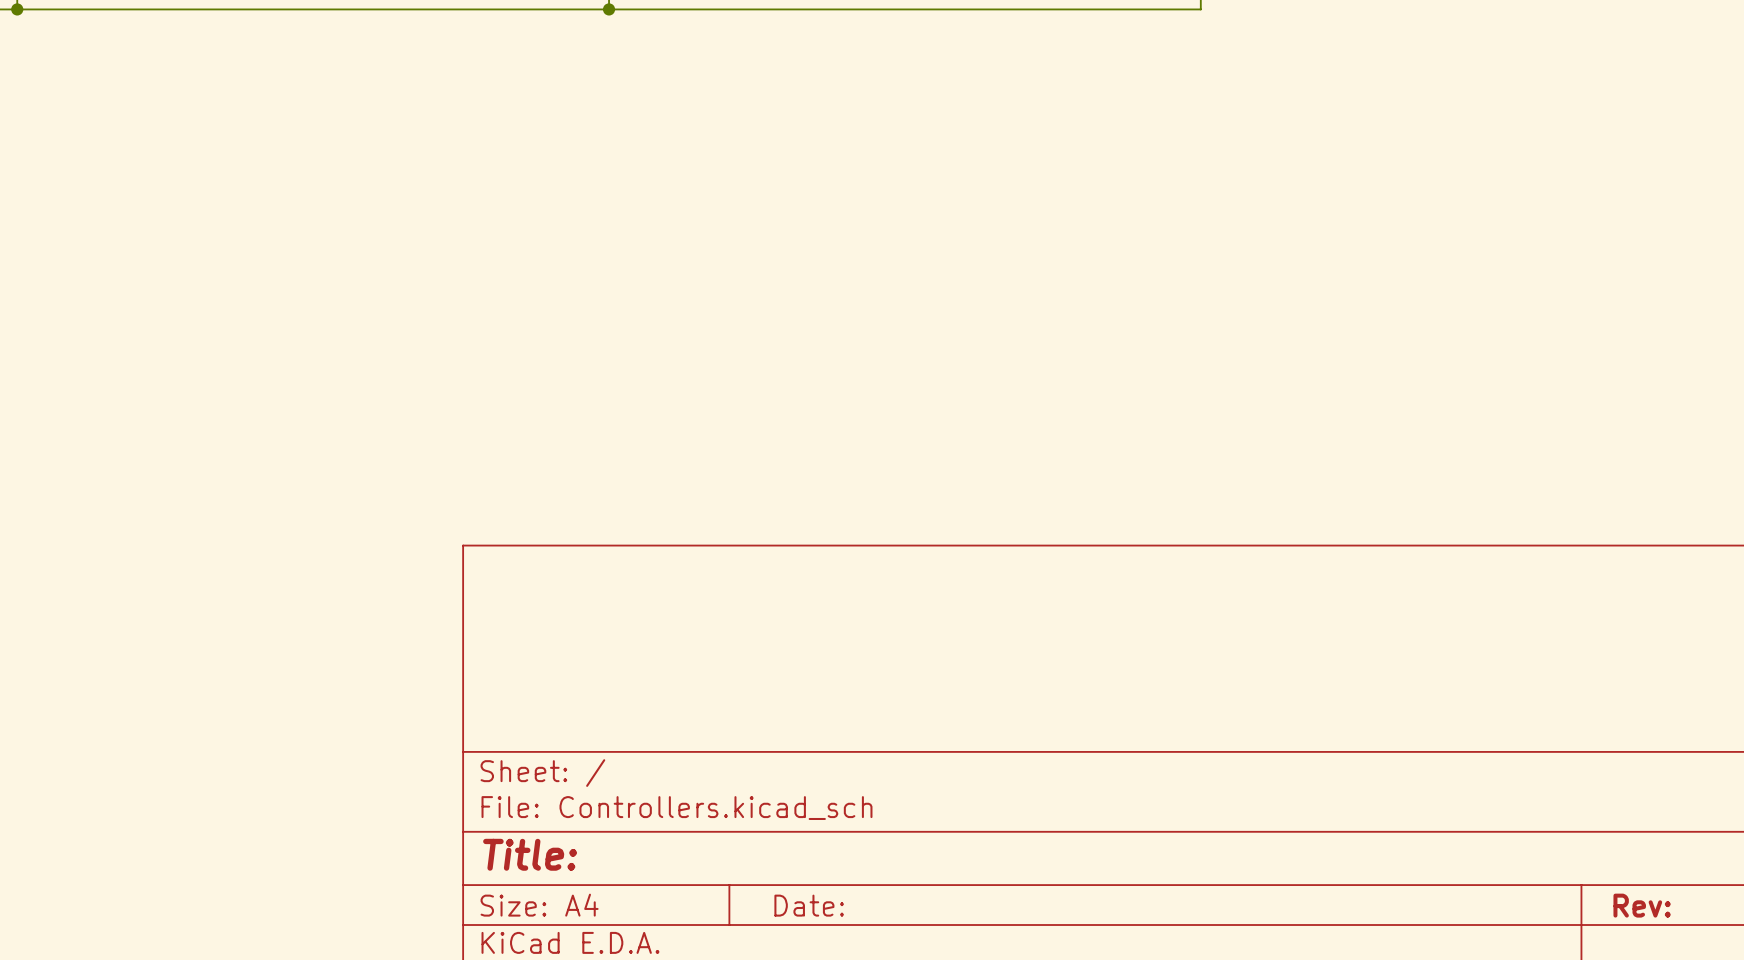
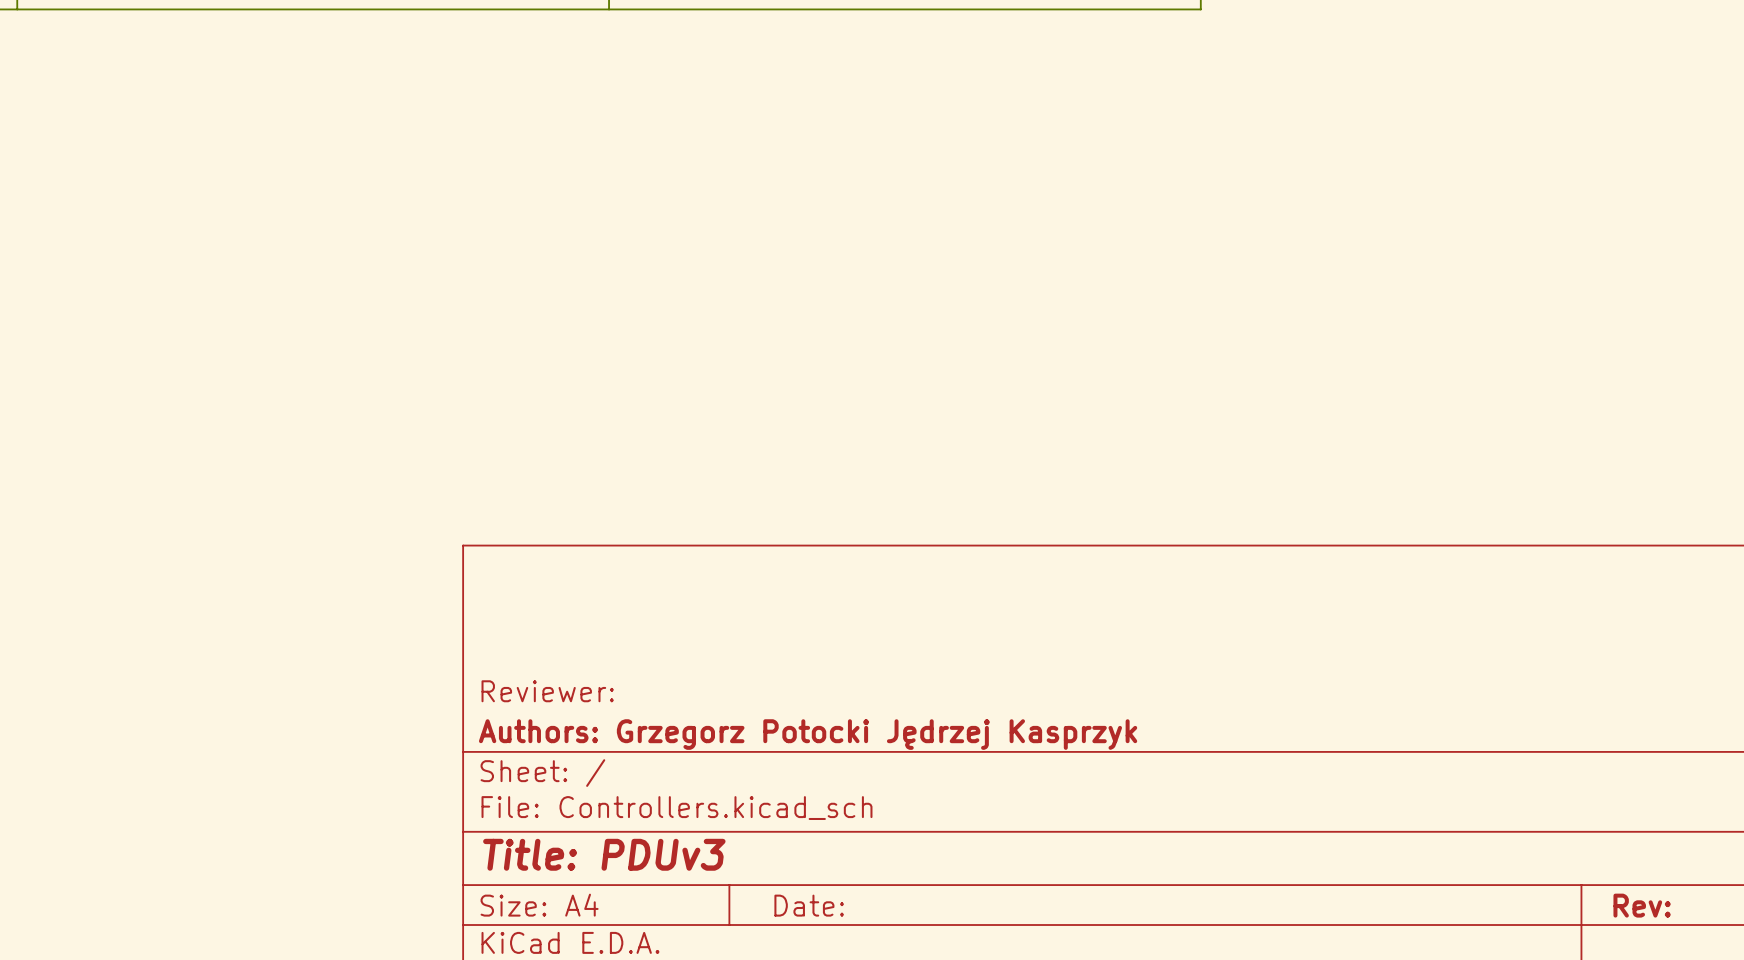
junction: (17, 9) -> none
junction: (609, 9) -> none
title block: none -> Reviewer: (547, 691)
title block: none -> Authors: Grzegorz Potocki Jędrzej Kasprzyk (808, 734)
title block: Title: (530, 854) -> Title: PDUv3 (604, 854)

